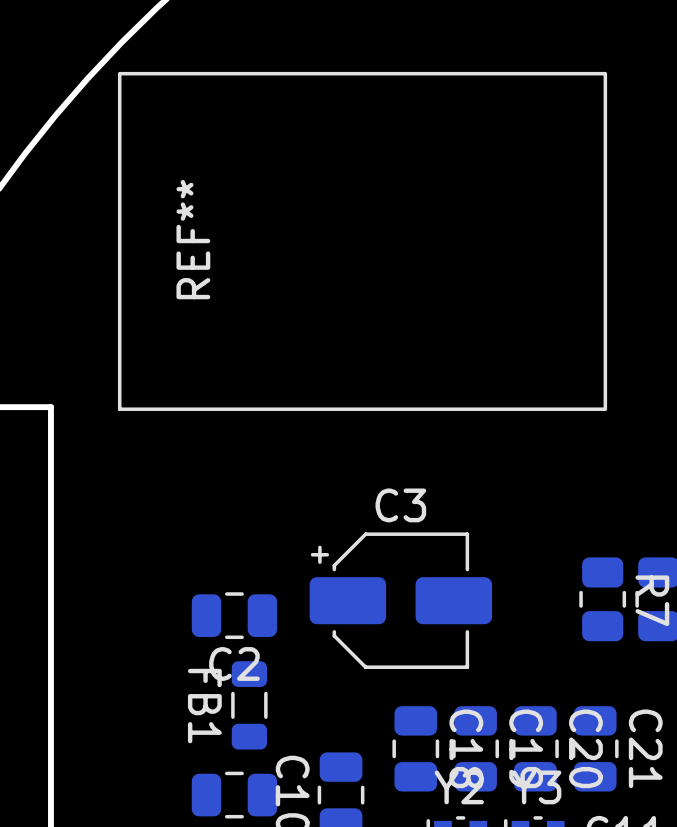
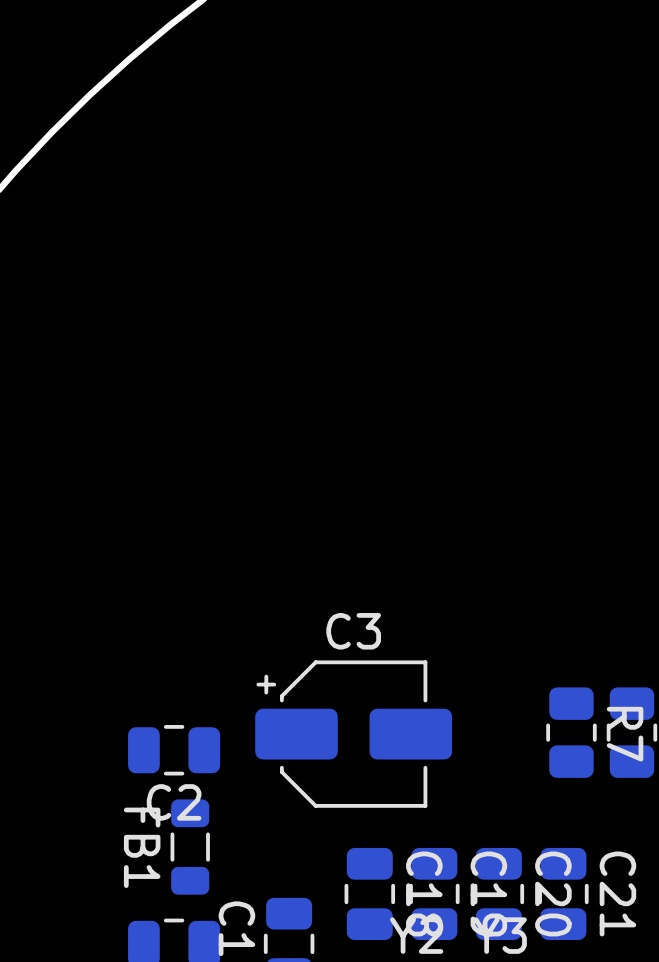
REF**: (362, 241) -> none

